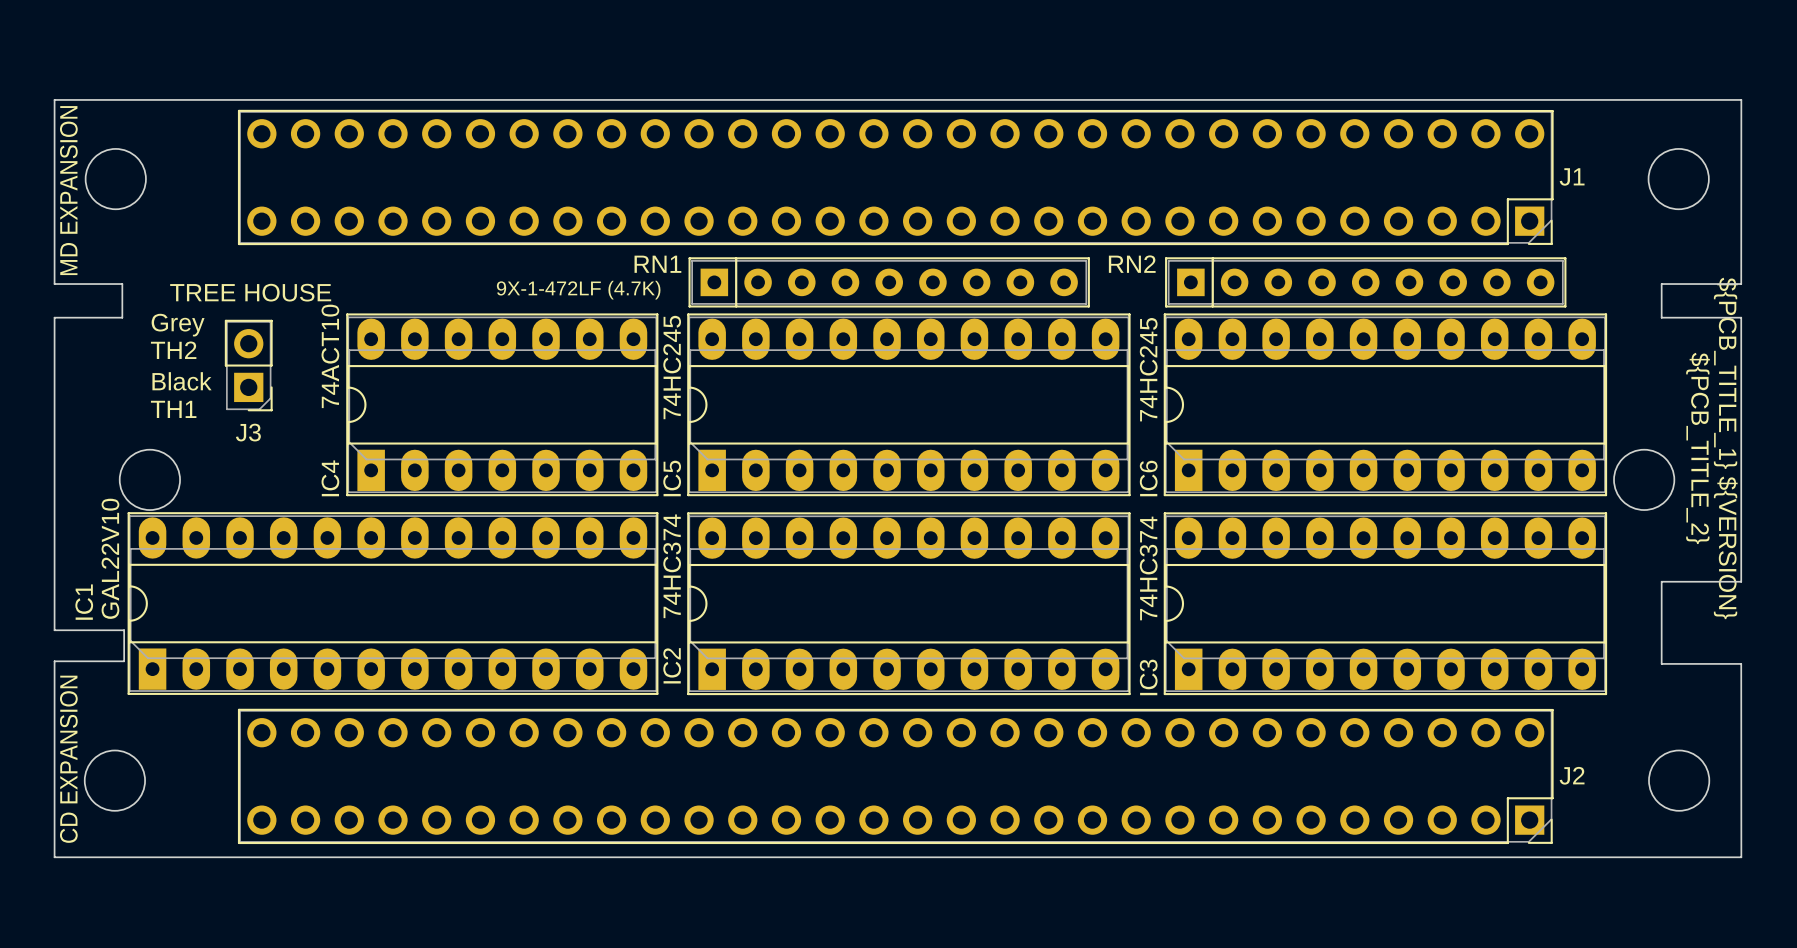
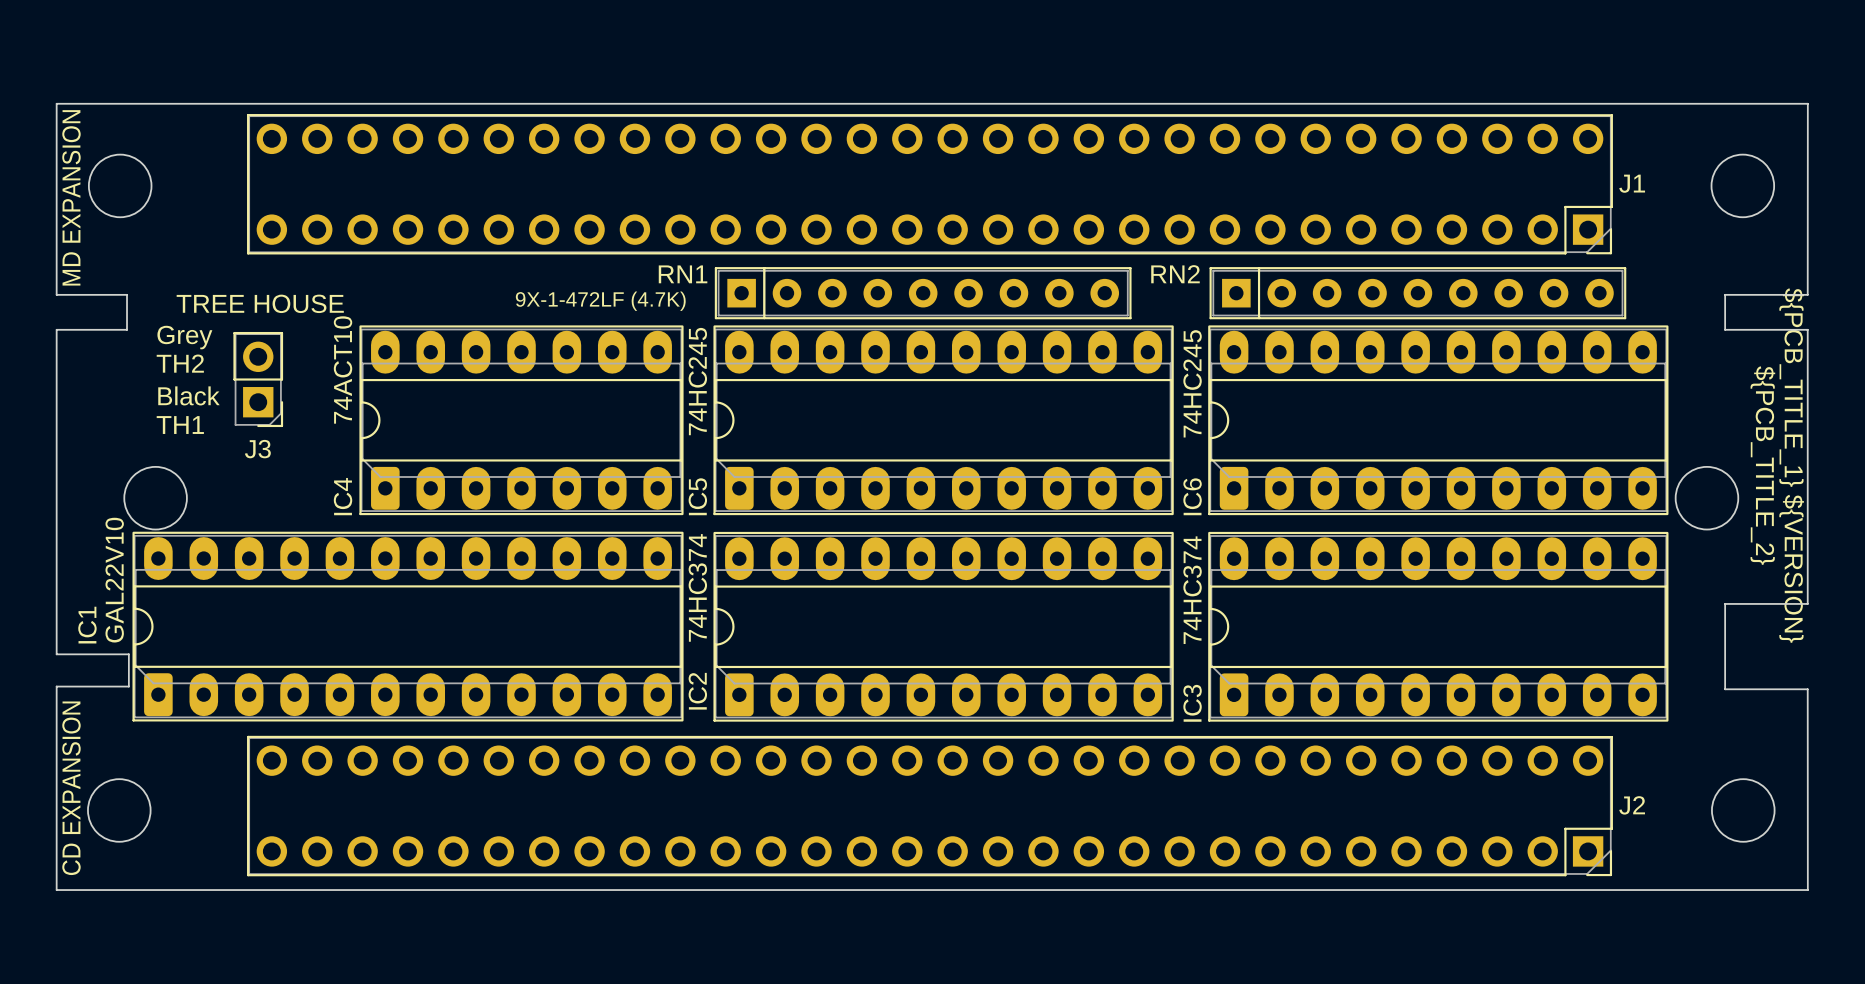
IC4 footprint: [346, 313, 659, 497] -> [359, 325, 684, 516]
IC5 footprint: [687, 313, 1131, 497] -> [713, 325, 1174, 516]
IC6 footprint: [1163, 313, 1608, 497] -> [1208, 325, 1669, 516]
IC1 footprint: [127, 512, 659, 695] -> [132, 531, 684, 722]
IC2 footprint: [687, 512, 1131, 696] -> [713, 531, 1174, 722]
IC3 footprint: [1163, 512, 1608, 696] -> [1208, 531, 1669, 722]

